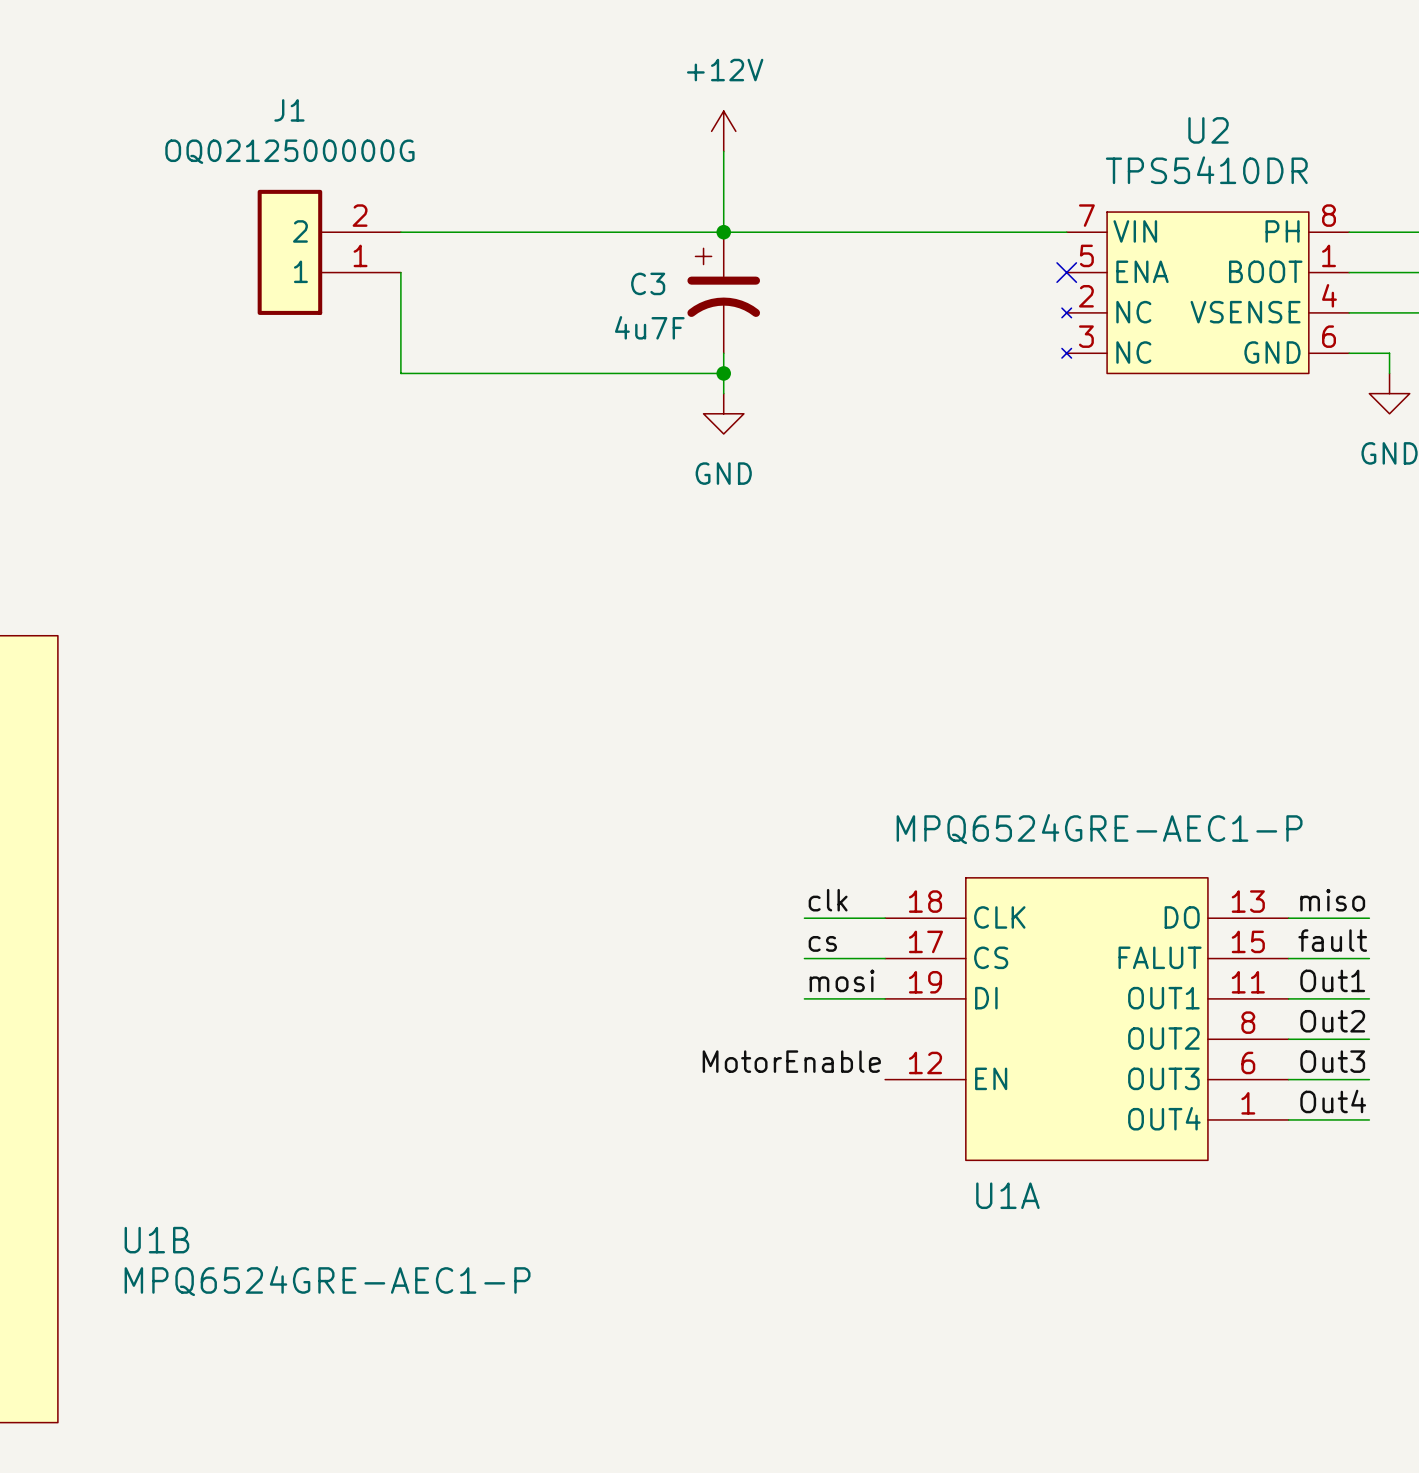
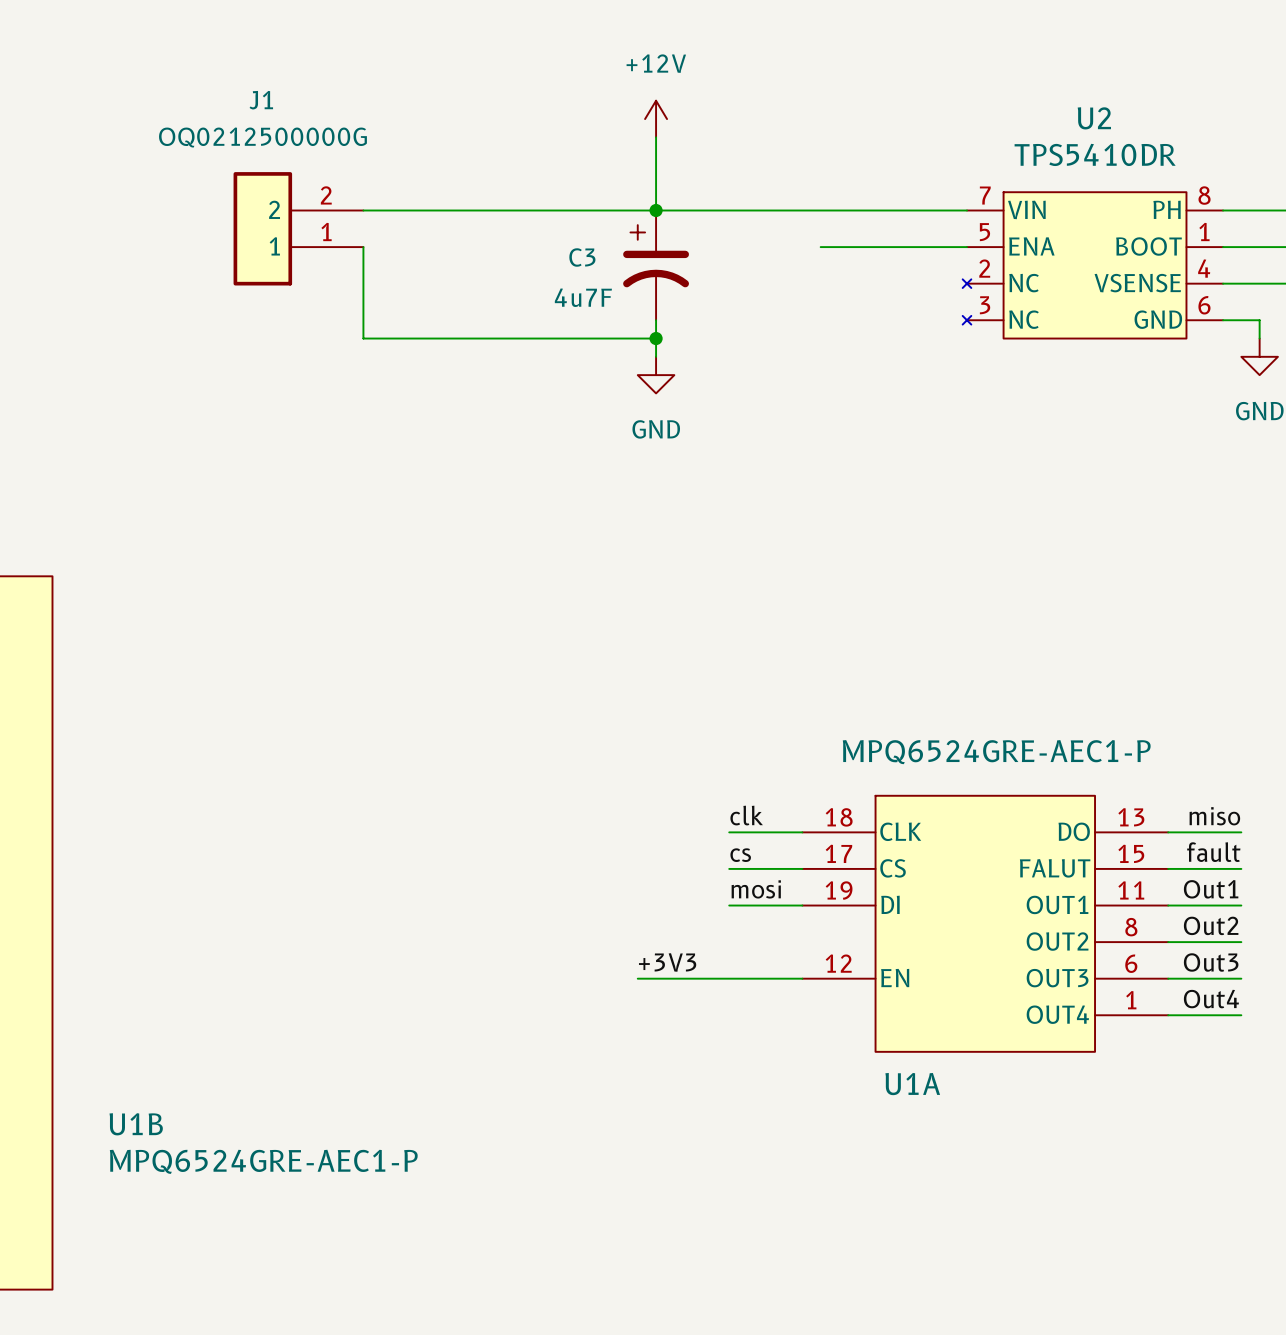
wire: none -> (820, 247) (966, 247)
no-connect mark: (1066, 272) -> none
label: none -> +3V3 (667, 962)
label: MotorEnable (791, 1061) -> none
wire: none -> (637, 978) (802, 978)

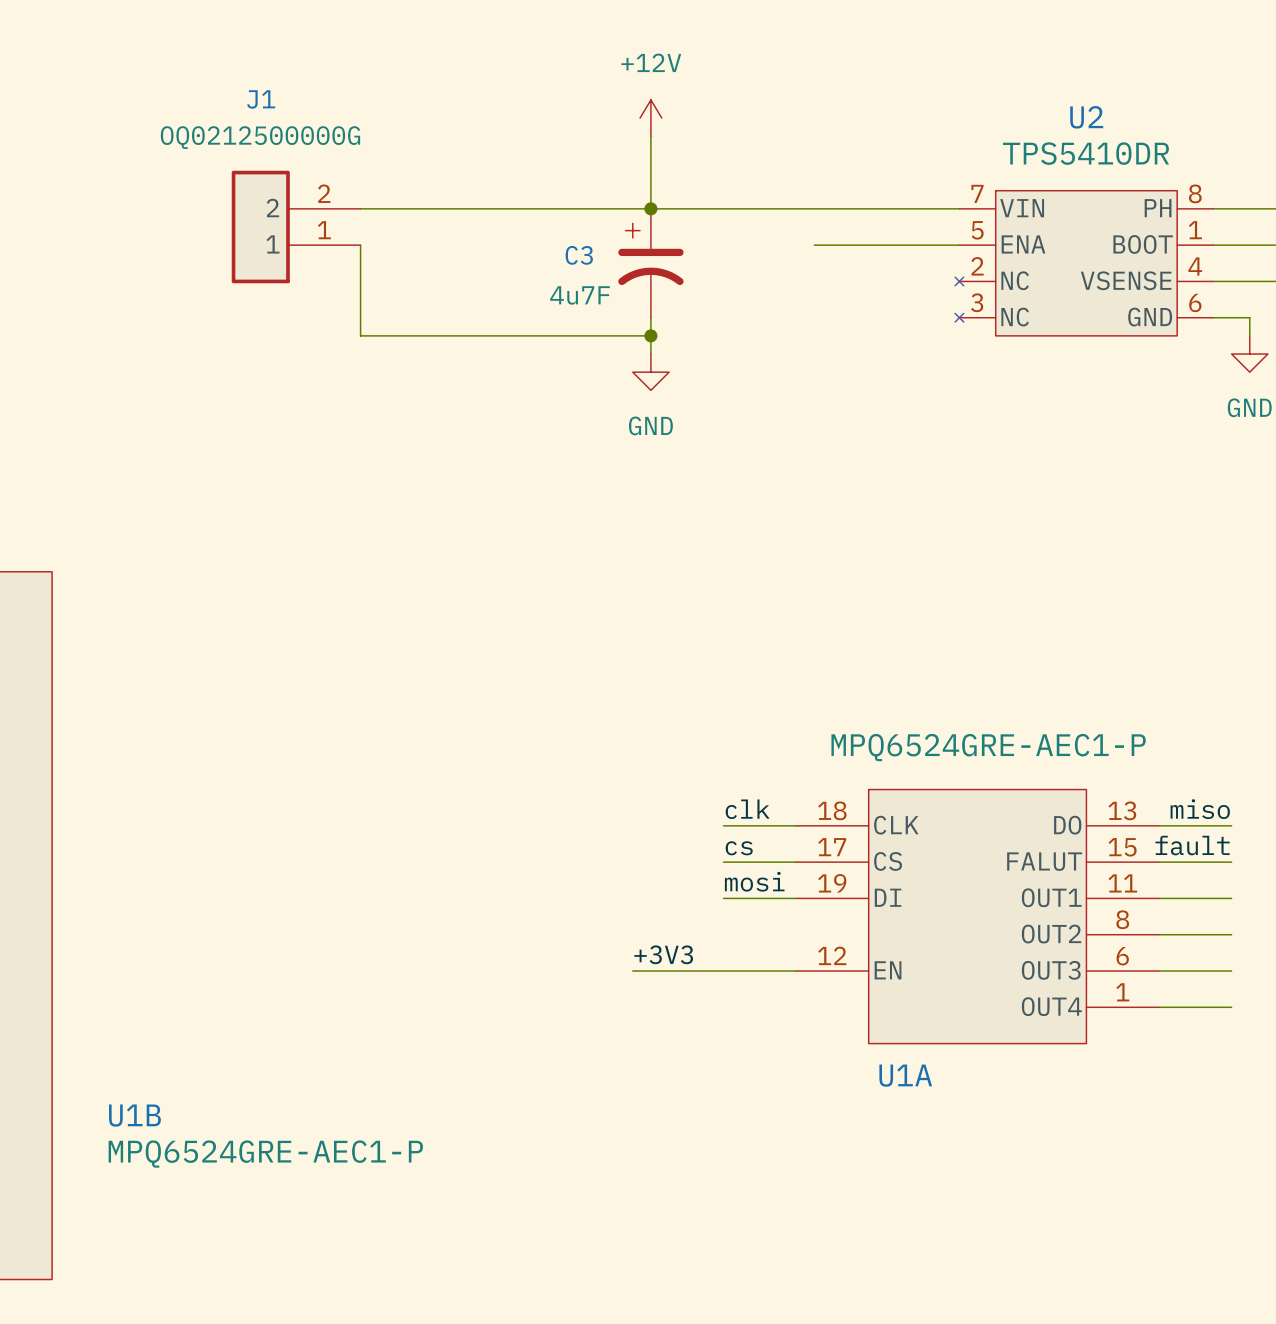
label: Out1 (1211, 889) -> none
label: Out2 (1211, 925) -> none
label: Out3 (1211, 962) -> none
label: Out4 (1211, 999) -> none

